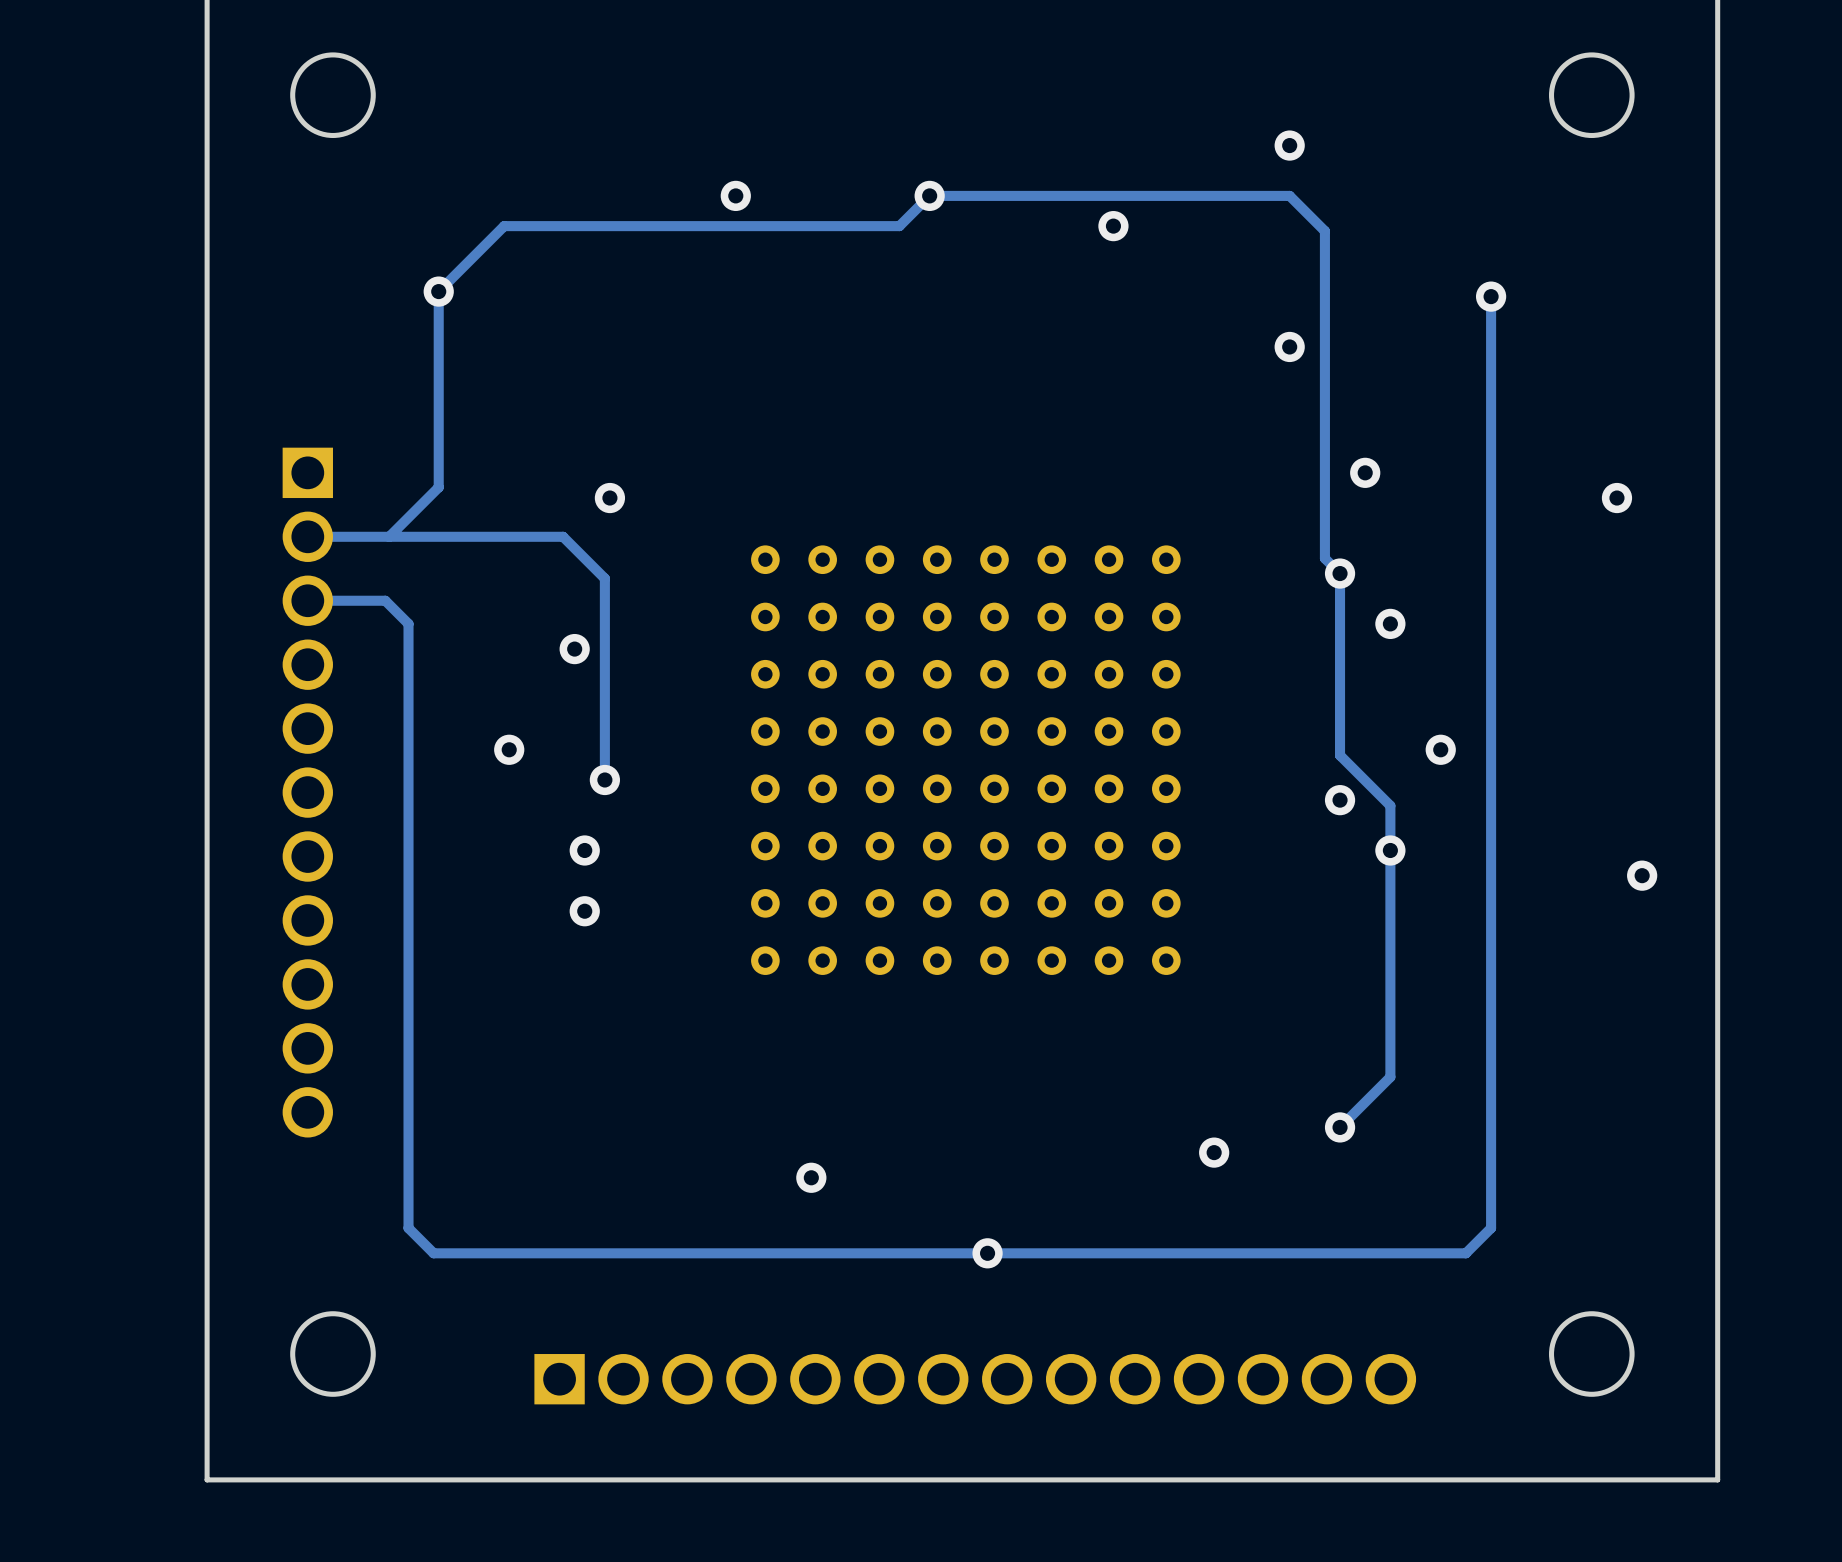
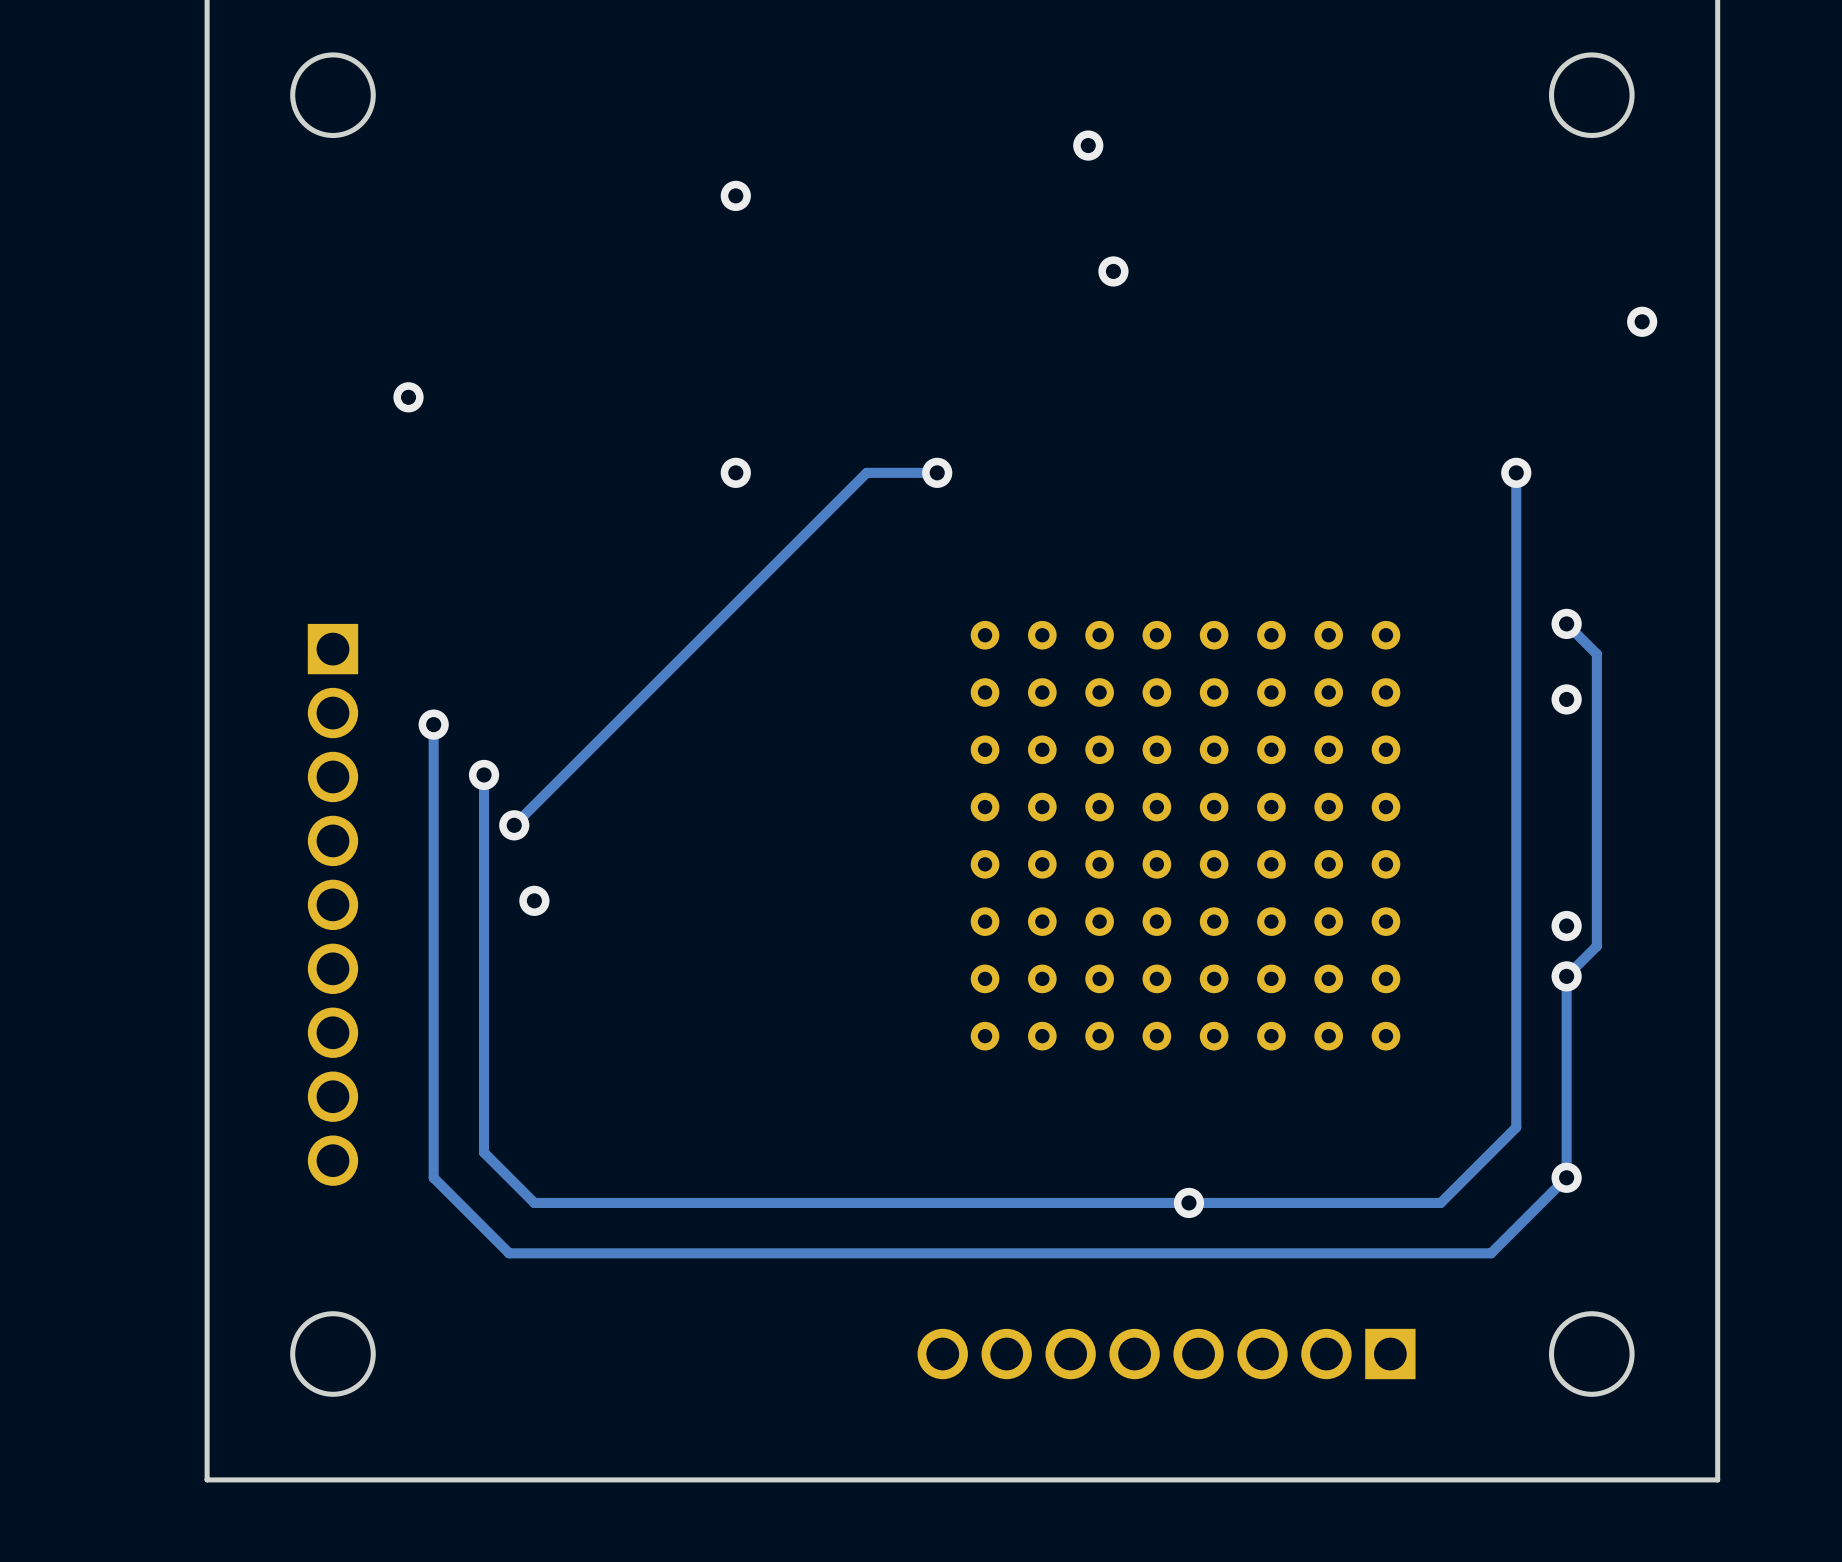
via: none -> (1088, 145)
via: (1289, 145) -> none
via: (929, 195) -> none
via: (1113, 226) -> none
via: none -> (1113, 271)
via position: (438, 291) -> (408, 397)
track: (1491, 296) (1491, 1228) (1465, 1253) -> (1566, 623) (1596, 654) (1596, 946) (1566, 976) (1566, 1177) (1491, 1253) (1465, 1253)
via: (1491, 296) -> none
via: none -> (1642, 321)
via: (1289, 346) -> none
via: none -> (735, 472)
track: none -> (937, 472) (866, 472) (514, 825)
via: none -> (937, 472)
via: (1365, 472) -> none
track: none -> (1516, 472) (1516, 1127) (1440, 1202) (534, 1202) (484, 1152) (484, 774)
via: none -> (1516, 472)
via: (609, 498) -> none
via: (1616, 498) -> none
track: (307, 536) (563, 536) (604, 578) (604, 780) -> none
track: (389, 536) (438, 487) (438, 291) (504, 226) (899, 226) (929, 195) (1289, 195) (1324, 231) (1324, 558) (1340, 573) (1340, 755) (1390, 805) (1390, 1077) (1340, 1127) -> none
via: (1340, 573) -> none
track: (307, 600) (385, 600) (408, 623) (408, 1228) (433, 1253) (509, 1253) -> (433, 724) (433, 1177) (509, 1253)
via: (1390, 623) -> none
via: none -> (1566, 623)
via: (574, 649) -> none
via: none -> (1566, 699)
via: none -> (433, 724)
via position: (509, 749) -> (484, 774)
via: (1440, 749) -> none
part position: (965, 760) -> (1185, 835)
via: (604, 780) -> none
part: (307, 792) -> none
via: (1340, 800) -> none
via: none -> (514, 825)
via: (584, 850) -> none
via: (1390, 850) -> none
via: (1642, 875) -> none
via: none -> (534, 900)
part: none -> (332, 904)
via: (584, 911) -> none
via: none -> (1566, 926)
via: none -> (1566, 976)
via: (1340, 1127) -> none
via position: (1214, 1152) -> (1188, 1202)
via: (811, 1177) -> none
via: none -> (1566, 1177)
via: (987, 1253) -> none
part: none -> (1166, 1354)
part: (975, 1379) -> none

